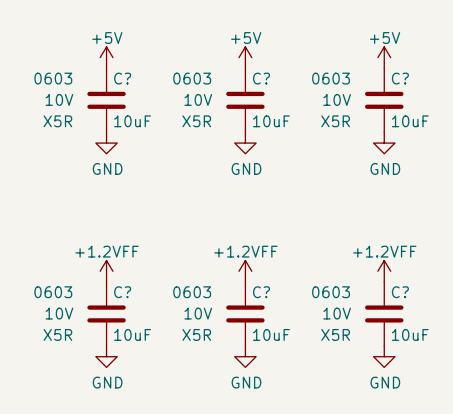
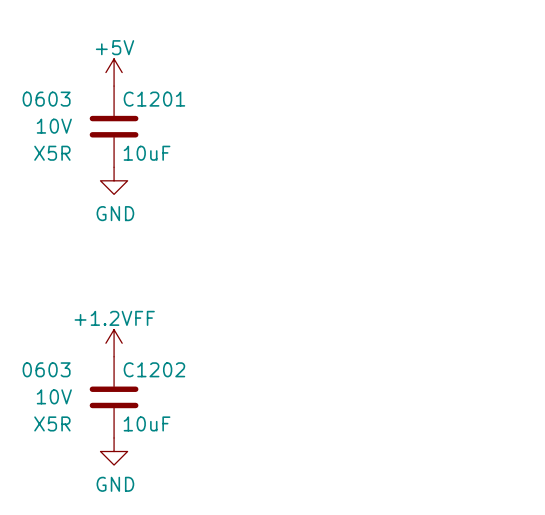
power symbol: +5V (245, 57) -> none
power symbol: +5V (384, 57) -> none
C? name: C? (122, 78) -> C1201 (154, 99)
C?: 10uF (245, 100) -> none
C?: 10uF (384, 100) -> none
power symbol: GND (245, 143) -> none
power symbol: GND (384, 143) -> none
power symbol: +1.2VFF (245, 271) -> none
power symbol: +1.2VFF (384, 271) -> none
C? name: C? (122, 292) -> C1202 (154, 369)
C?: 10uF (245, 313) -> none
C?: 10uF (384, 313) -> none
power symbol: GND (245, 356) -> none
power symbol: GND (384, 356) -> none

